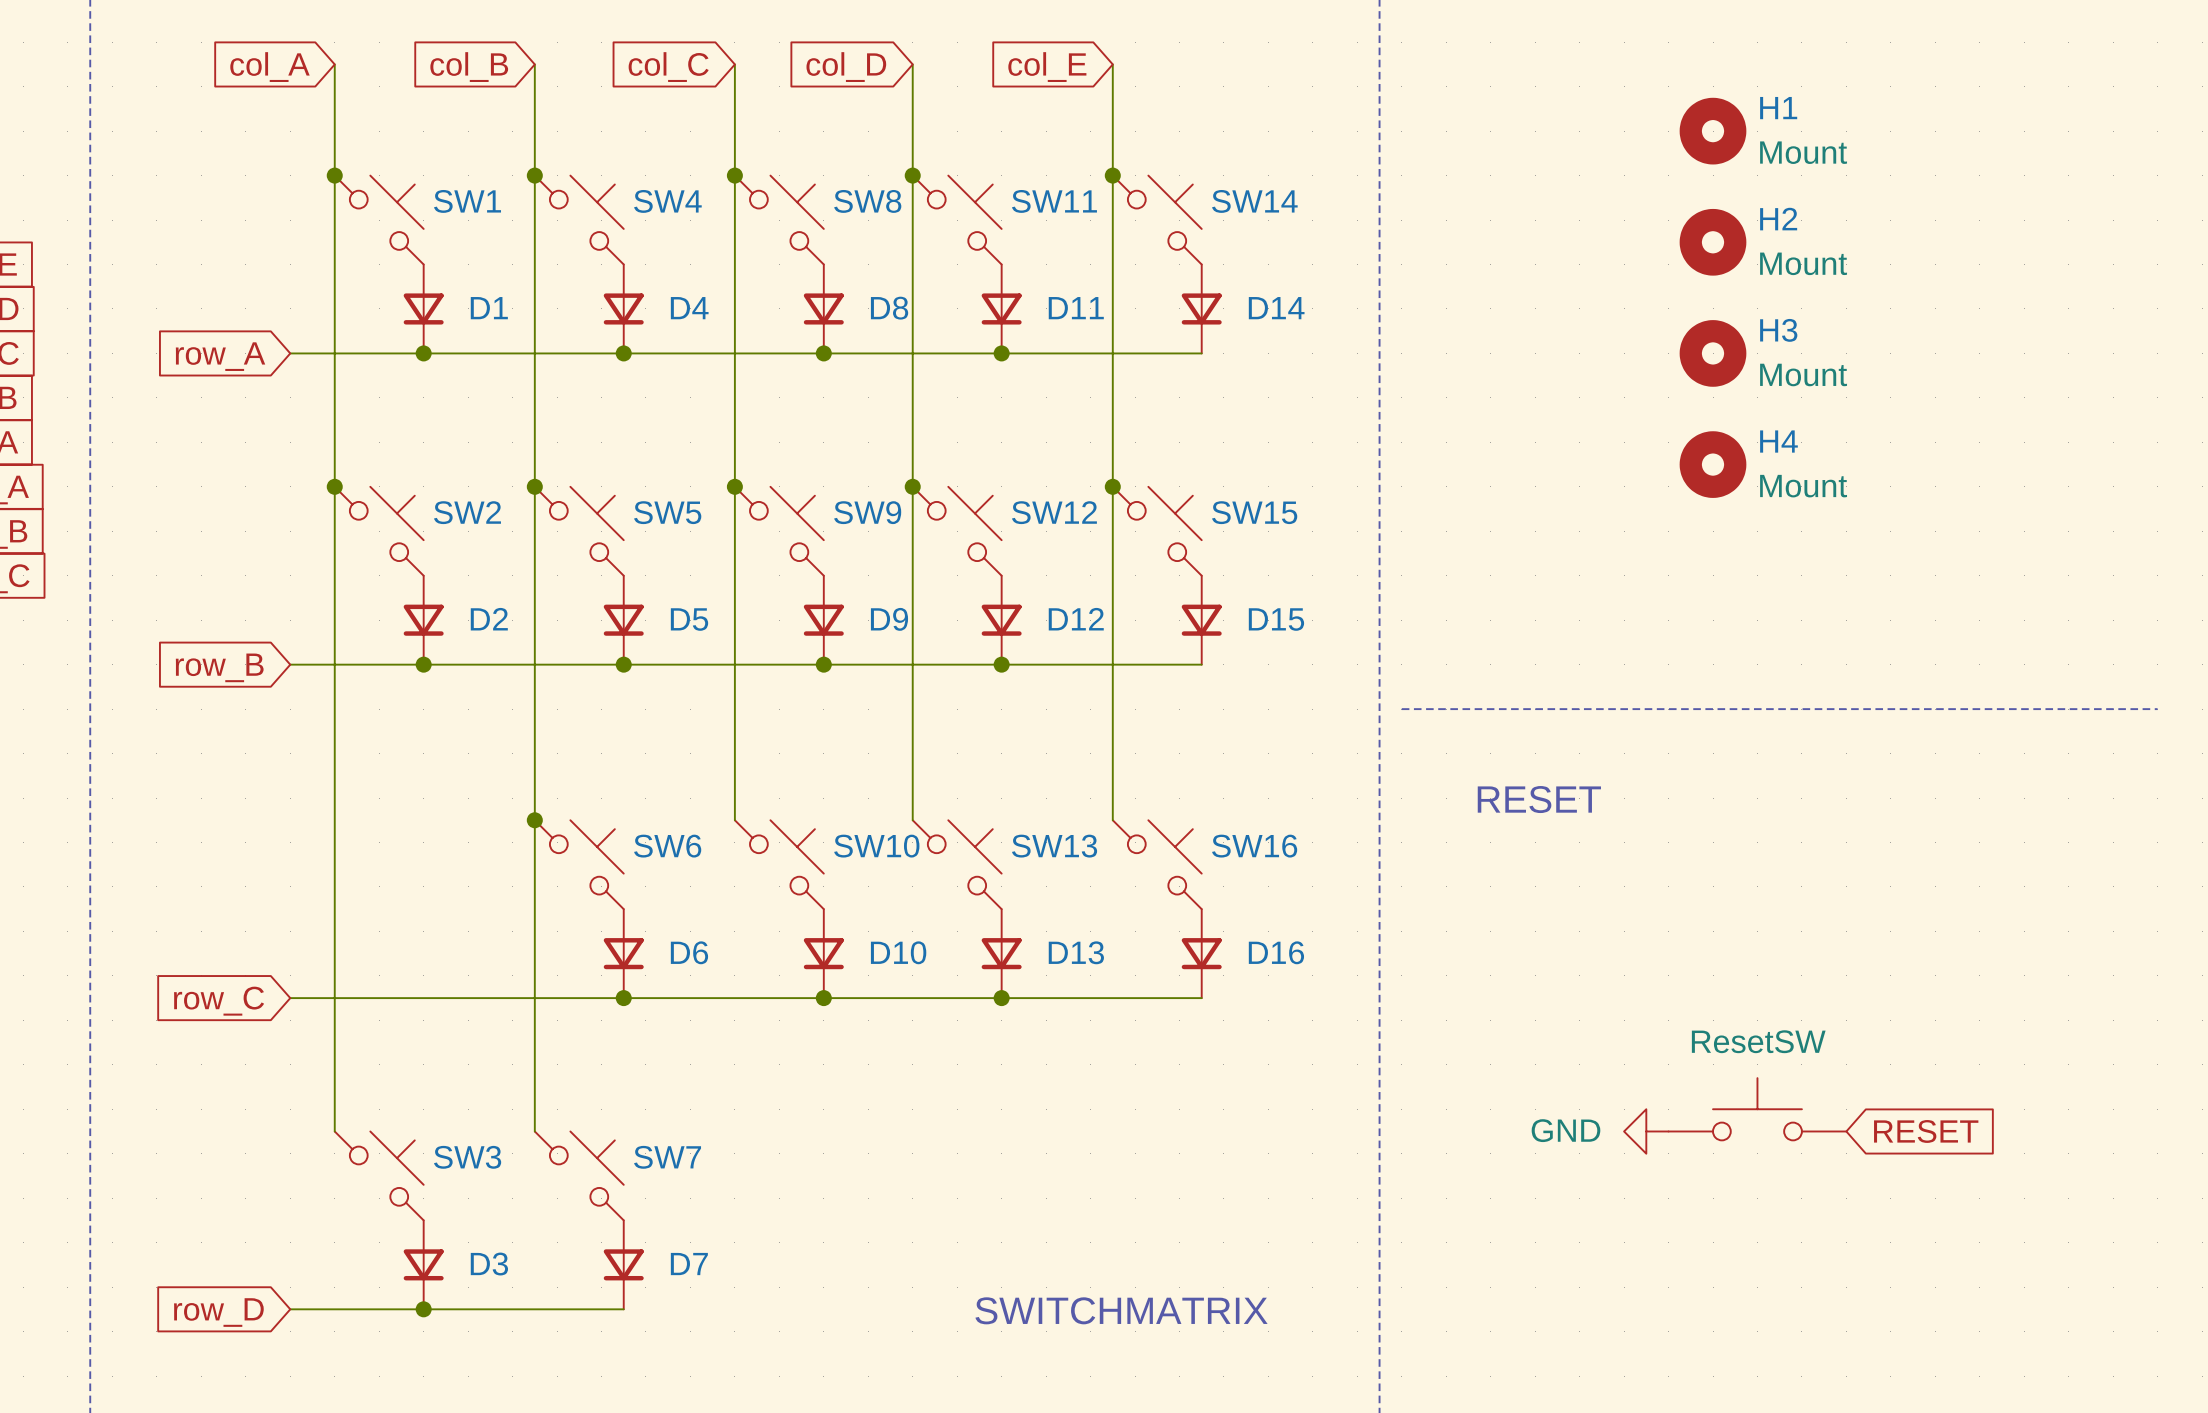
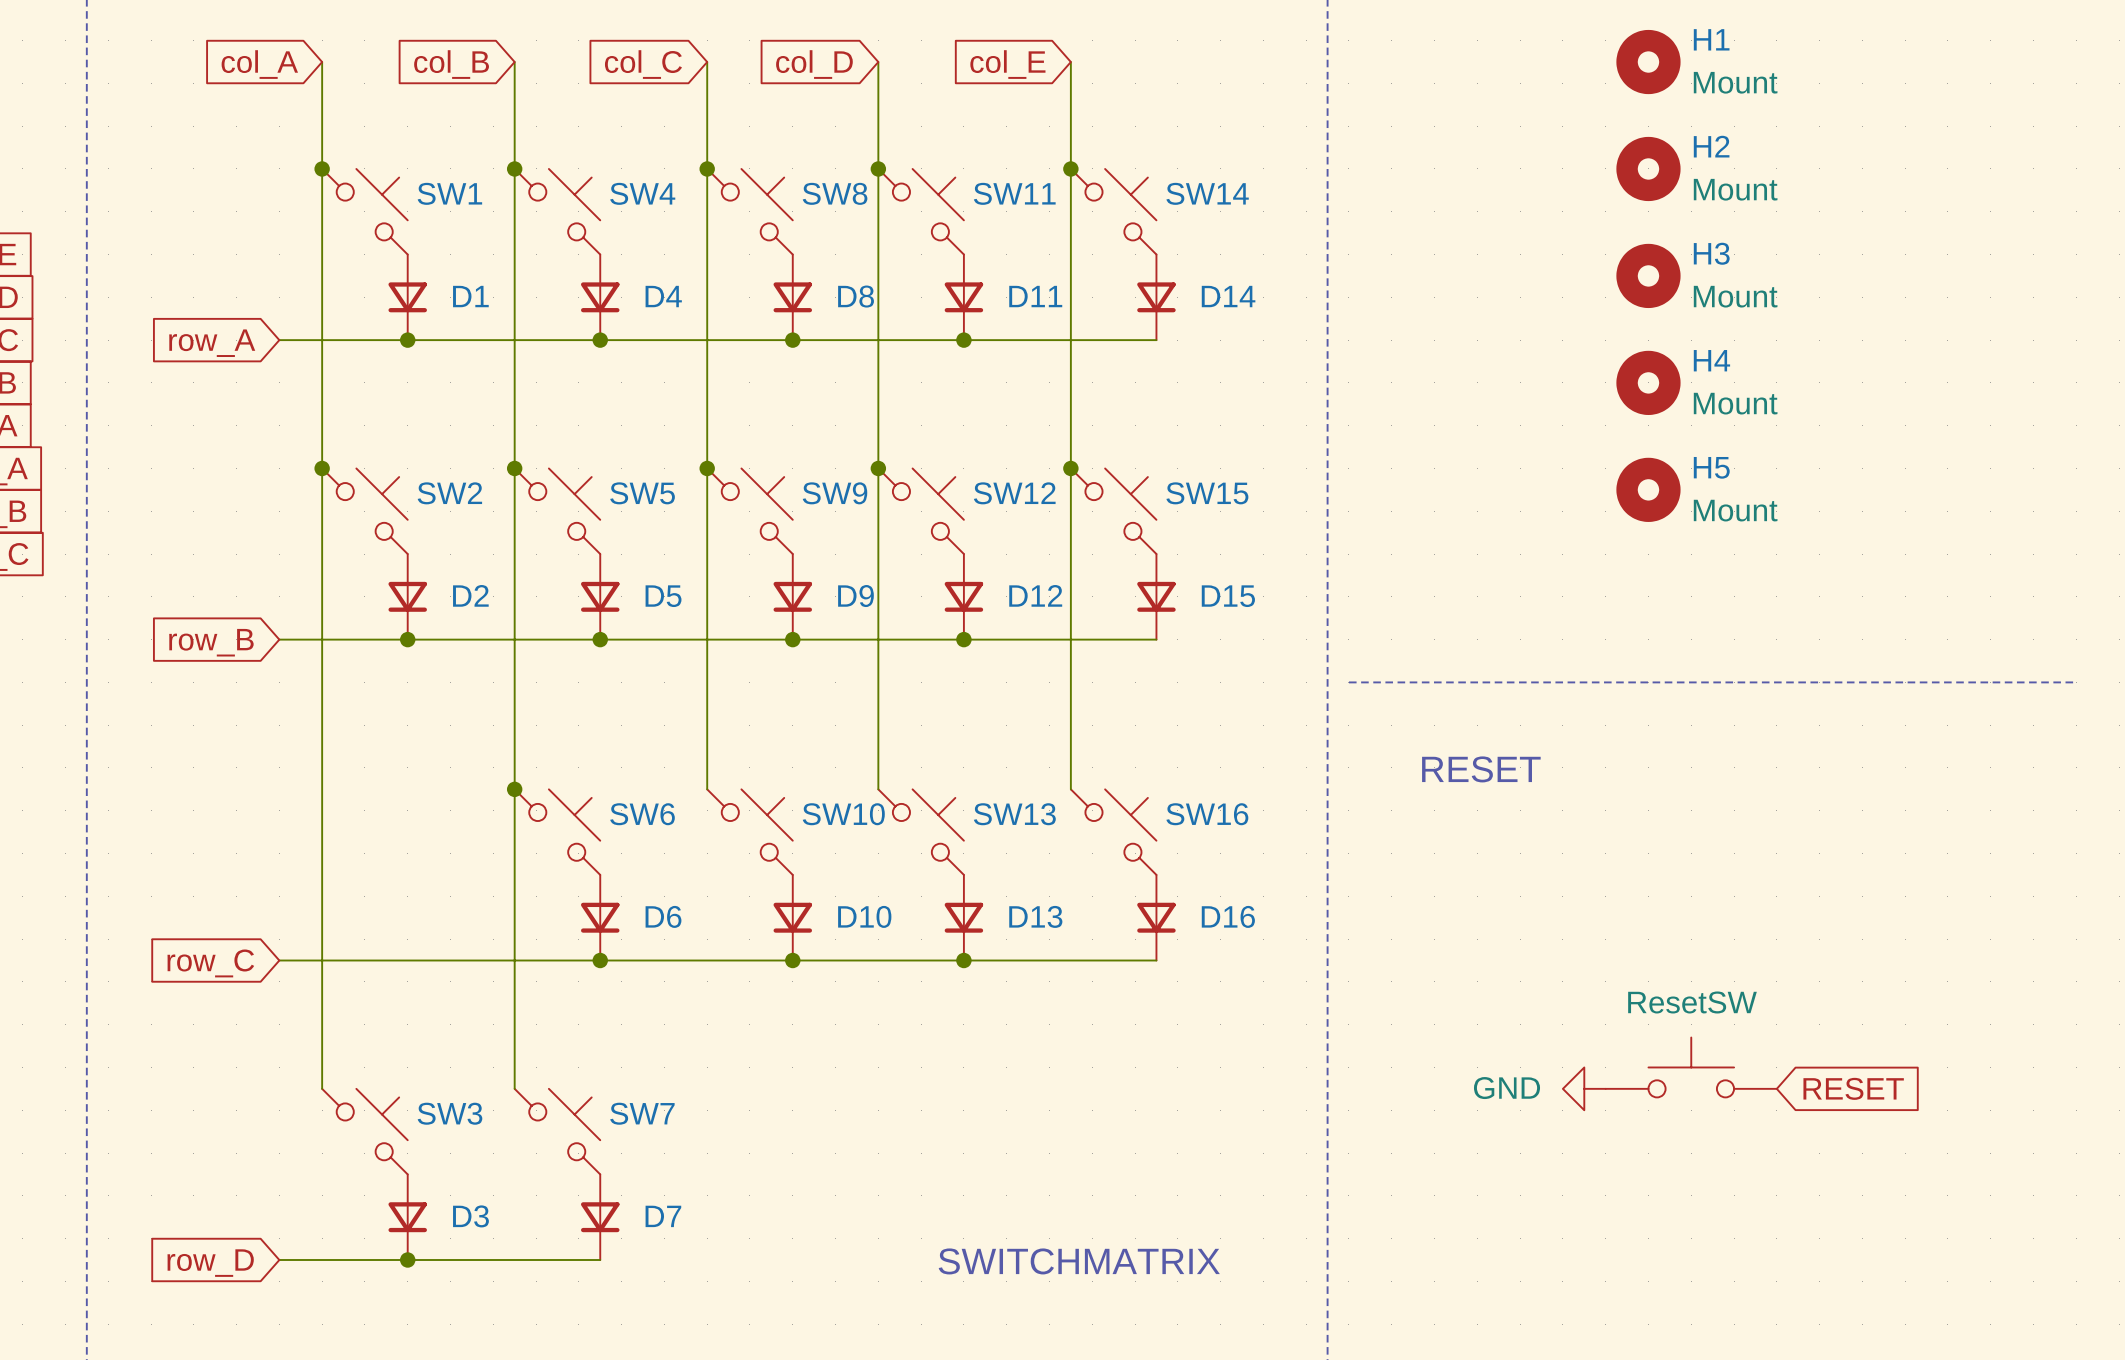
H1 position: (1713, 131) -> (1648, 62)
H2 position: (1713, 242) -> (1648, 168)
H3 position: (1713, 353) -> (1648, 275)
H4 position: (1713, 464) -> (1648, 382)
H5: none -> Mount (1648, 489)

